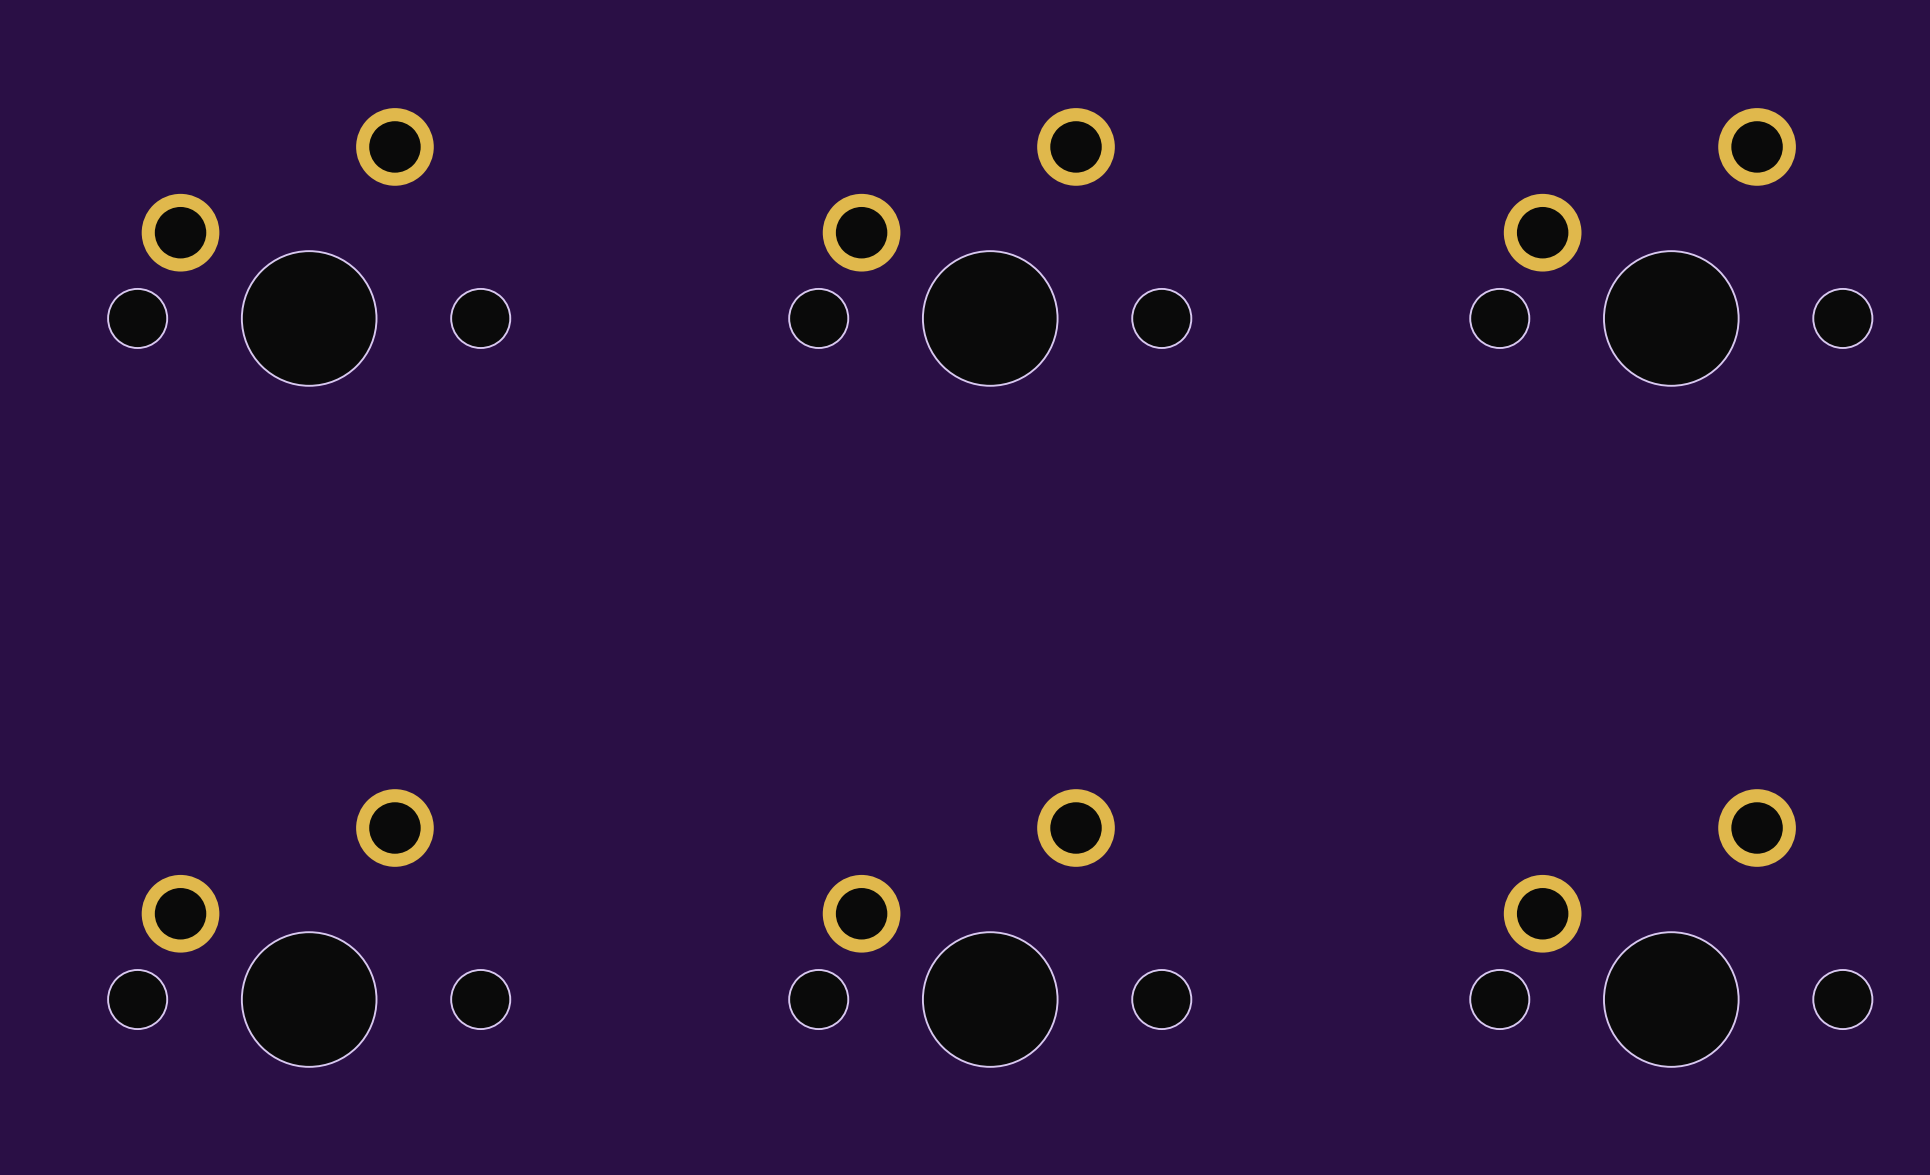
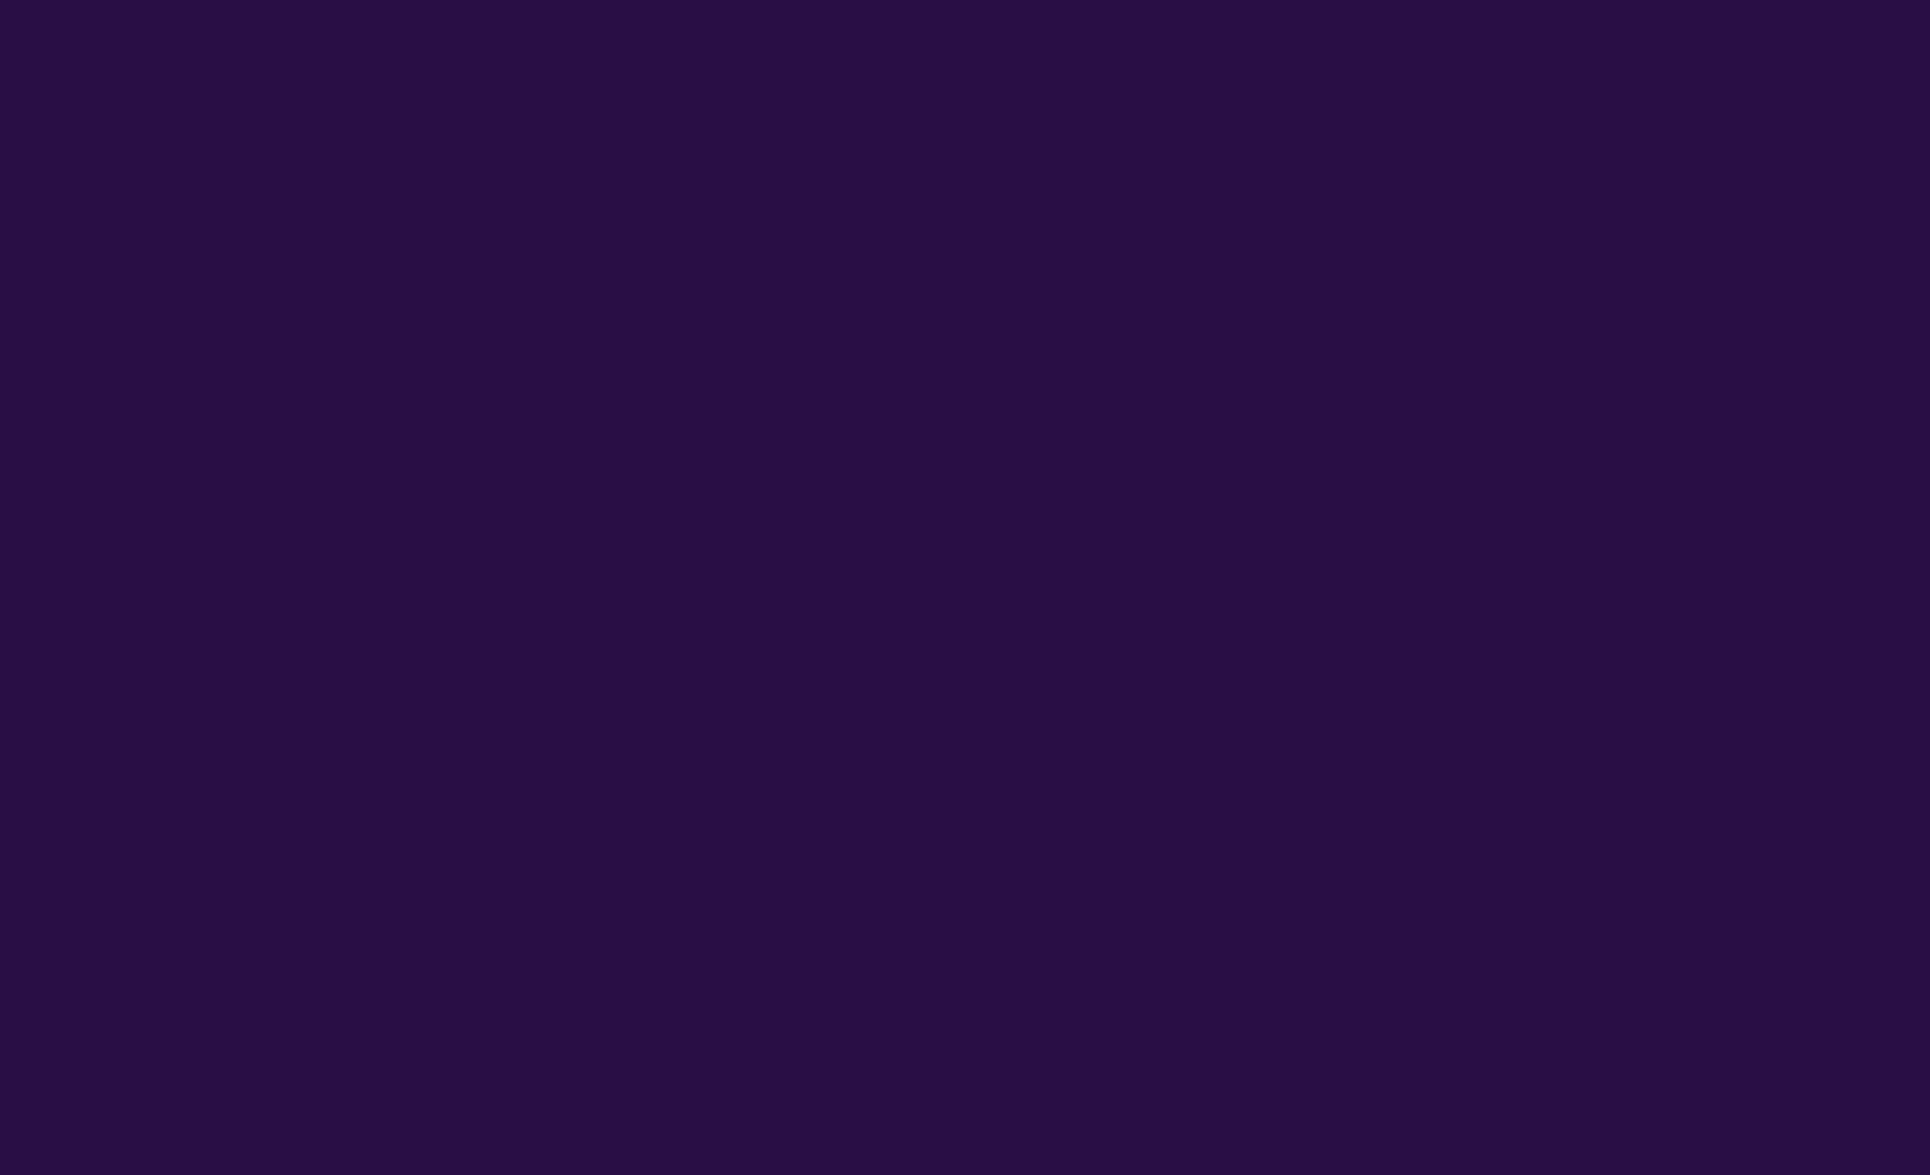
part: (309, 246) -> none
part: (990, 246) -> none
part: (1671, 246) -> none
part: (309, 928) -> none
part: (990, 928) -> none
part: (1671, 928) -> none

